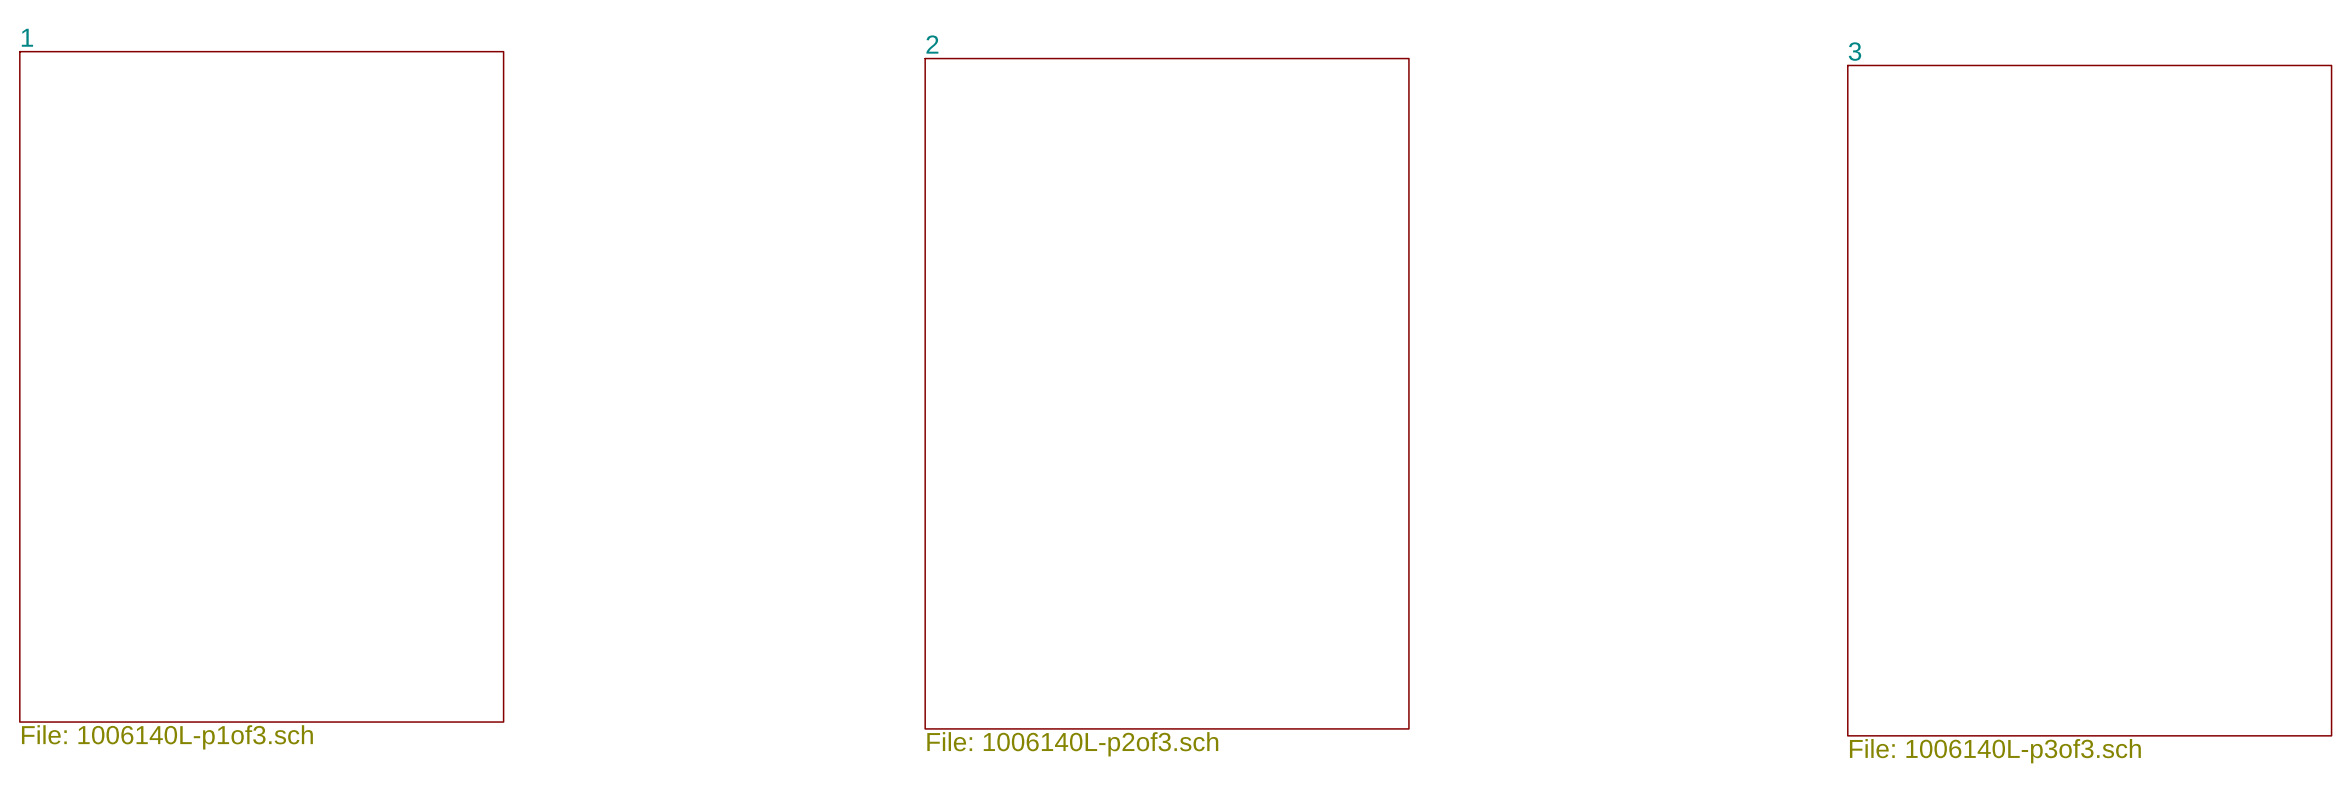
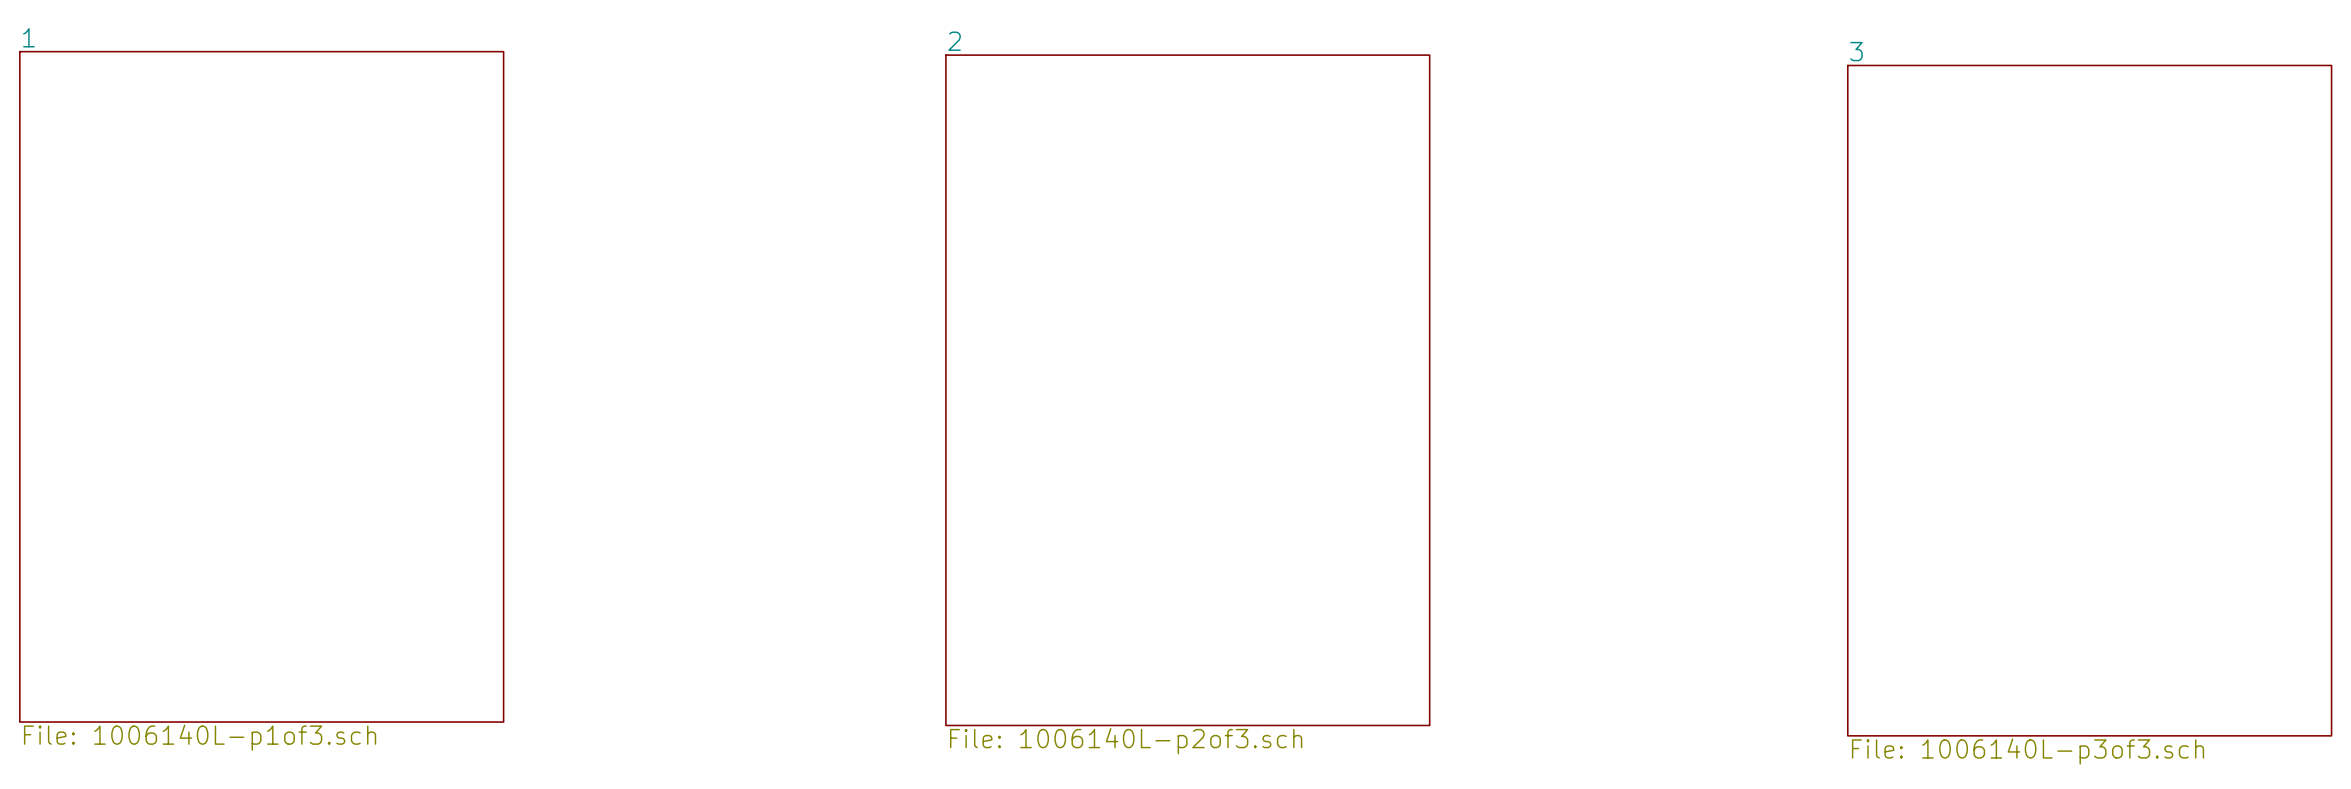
sheet 2 position: (1167, 393) -> (1187, 390)

